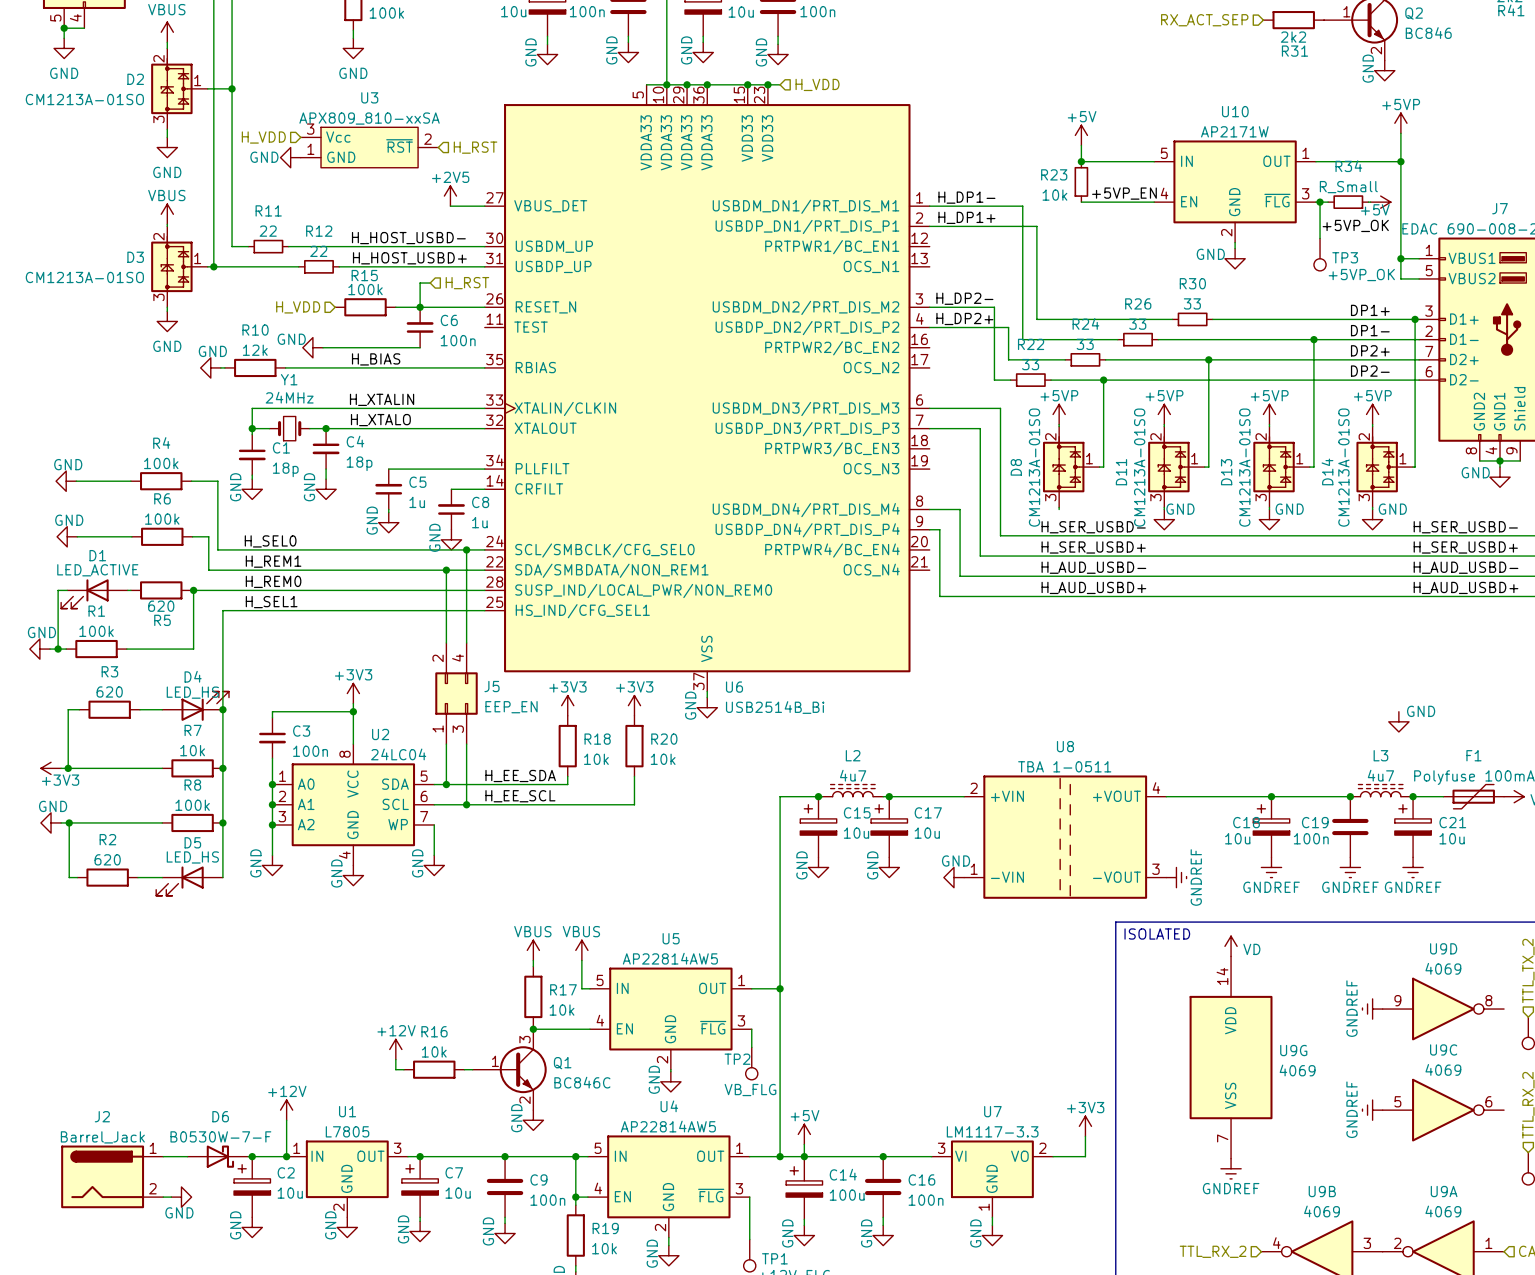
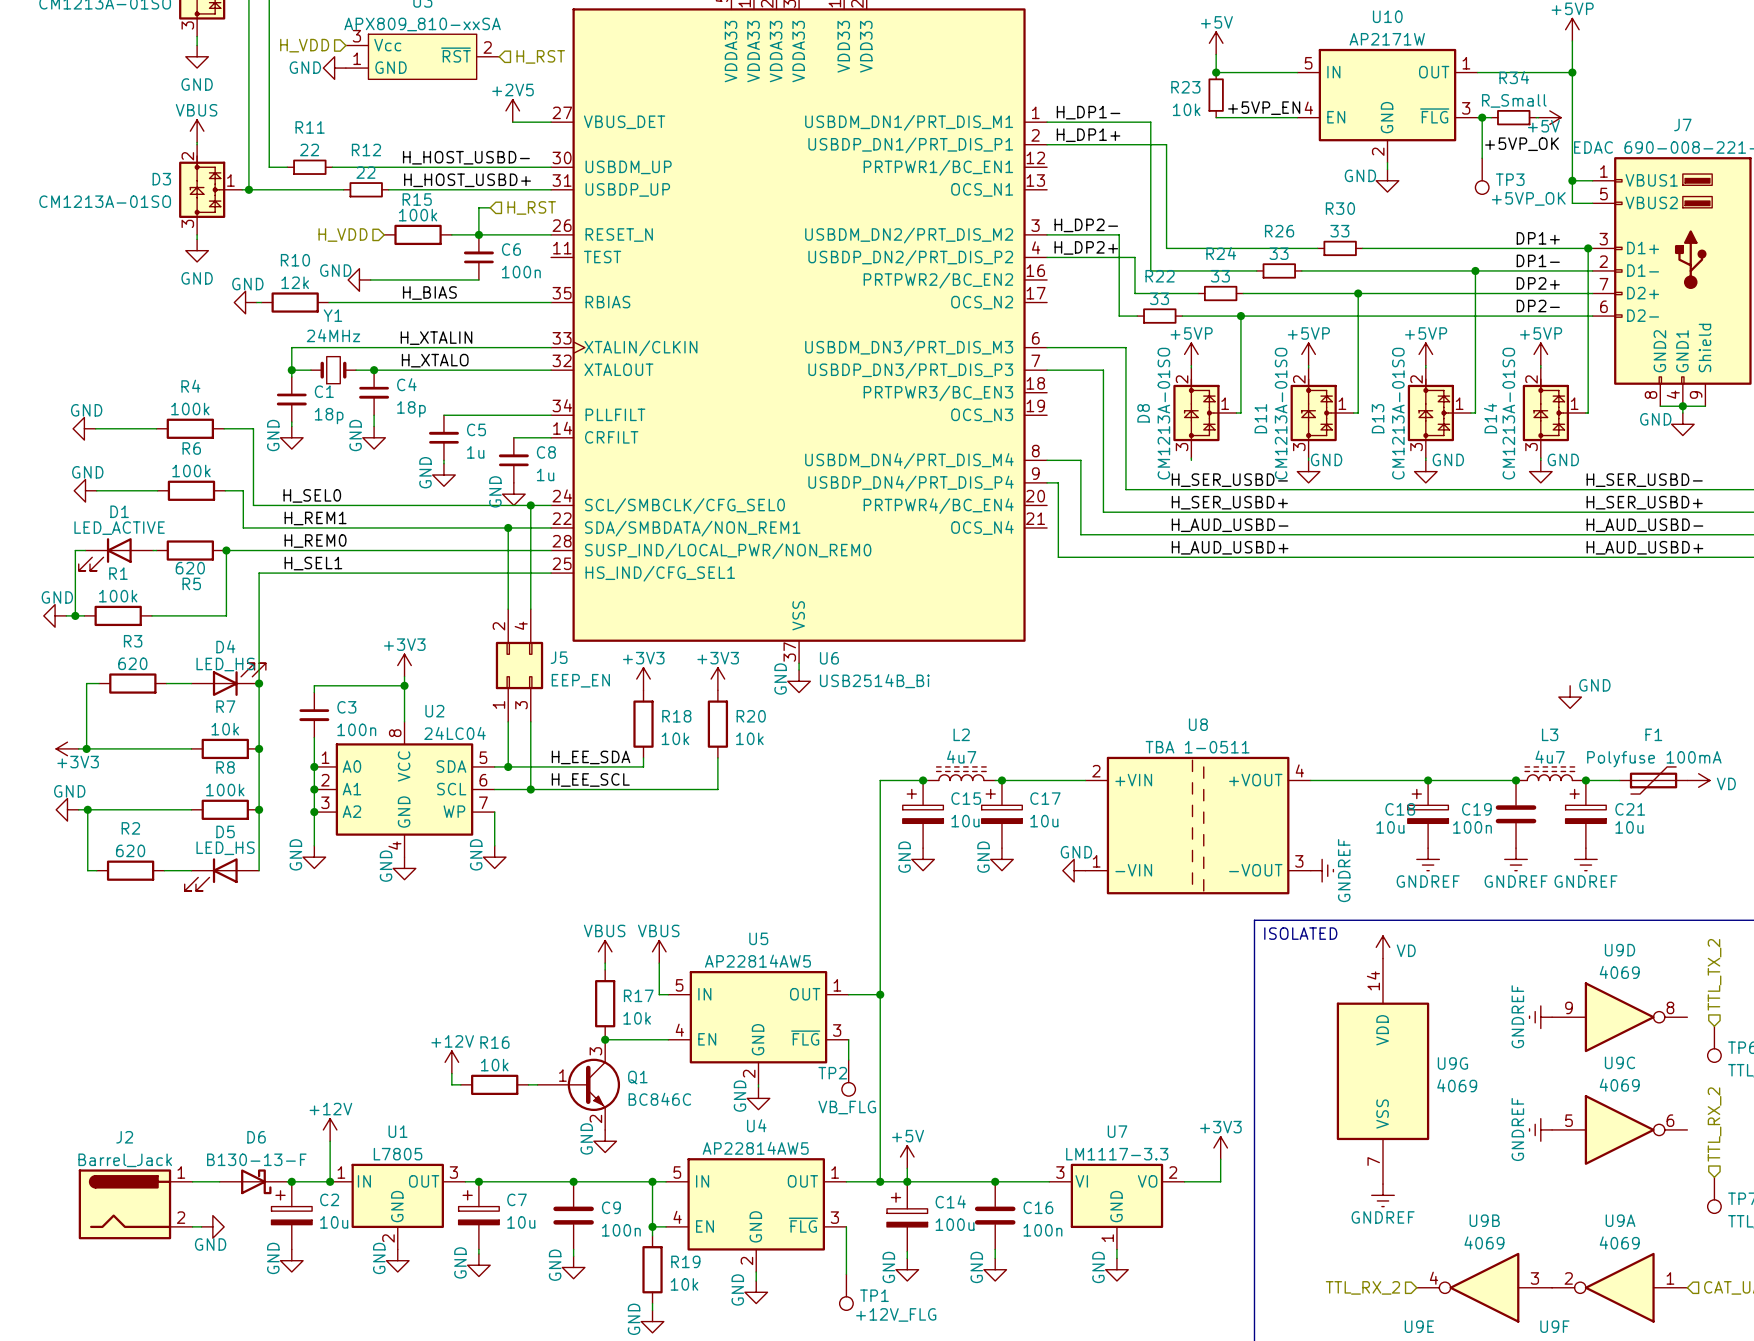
D6 value: B0530W-7-F (220, 1136) -> B130-13-F (256, 1159)

